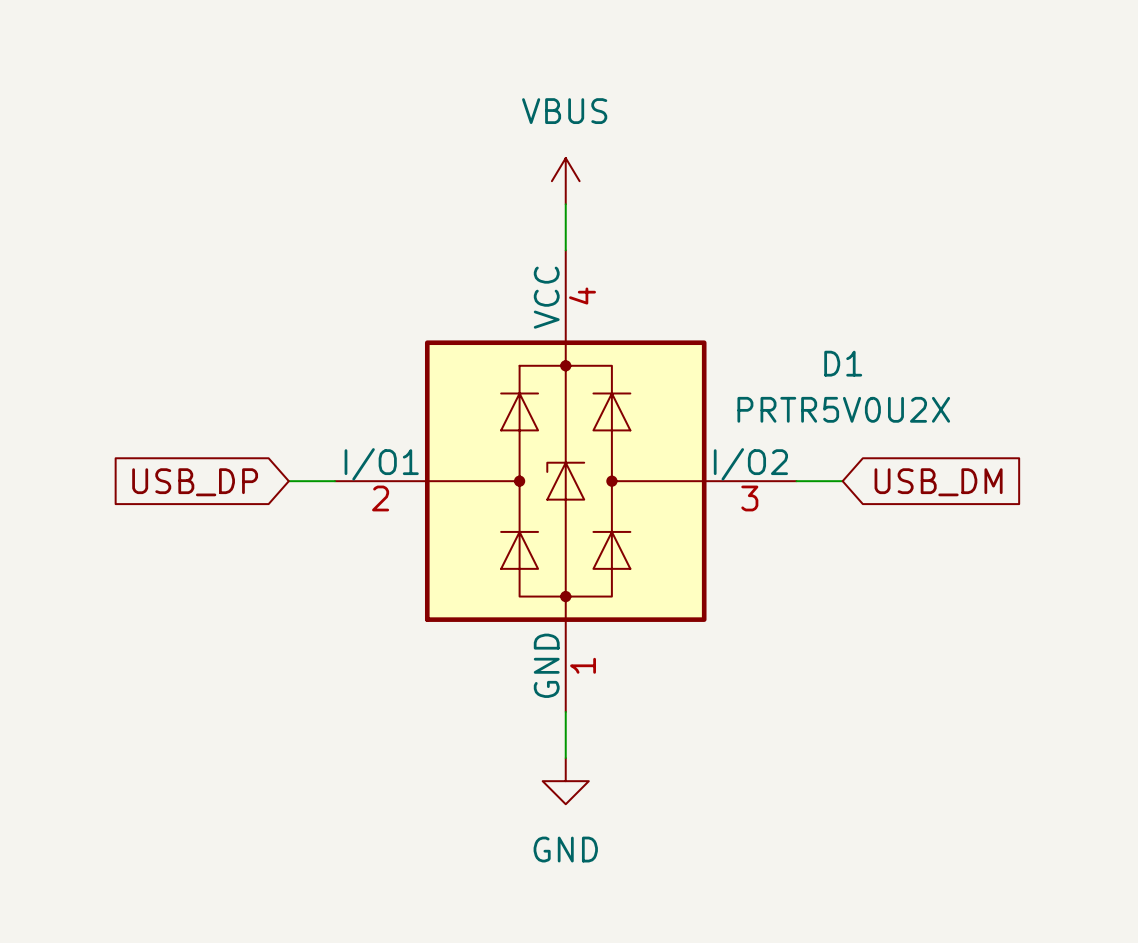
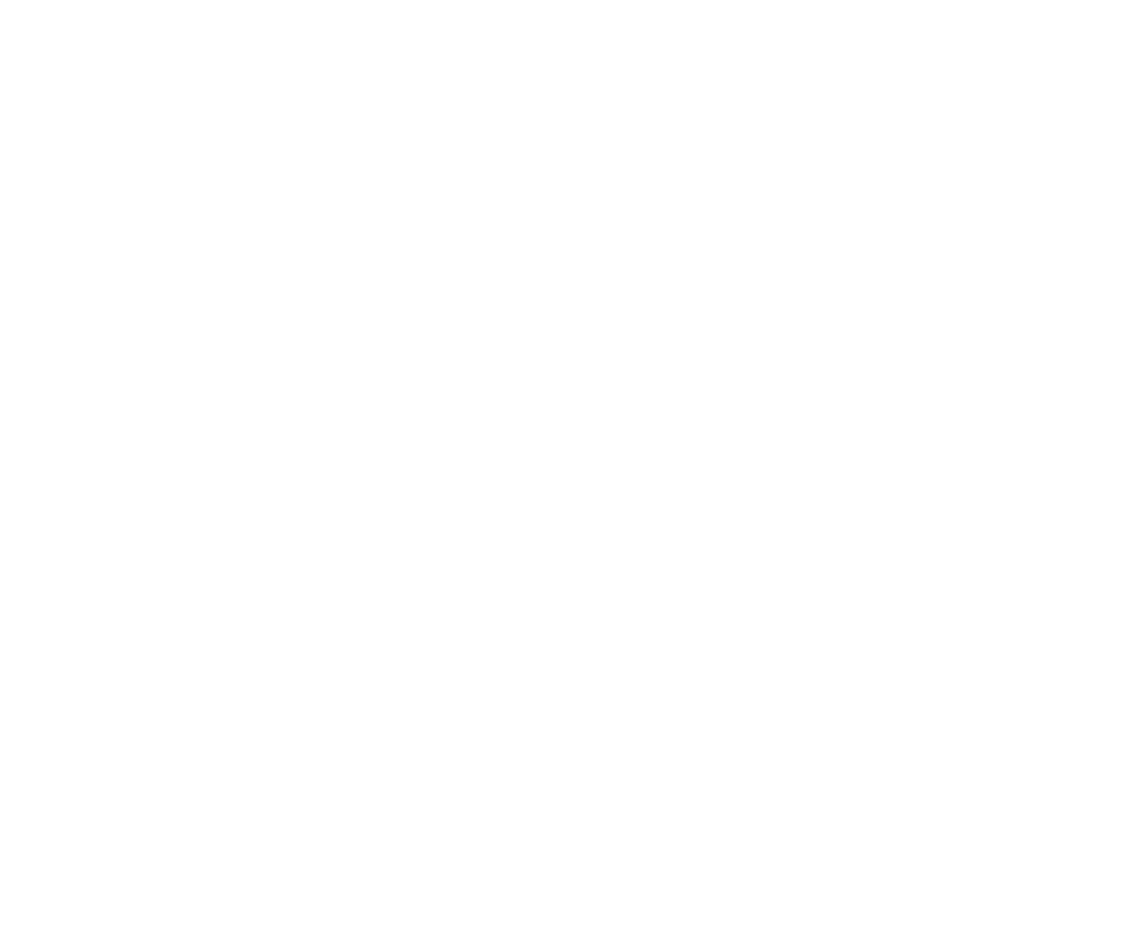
power symbol: VBUS (565, 181) -> none
wire: (565, 204) (565, 250) -> none
wire: (288, 481) (334, 481) -> none
D1: PRTR5V0U2X (565, 481) -> none
wire: (796, 481) (842, 481) -> none
global label: USB_DP (195, 482) -> none
global label: USB_DM (938, 482) -> none
wire: (565, 711) (565, 758) -> none
power symbol: GND (565, 781) -> none

